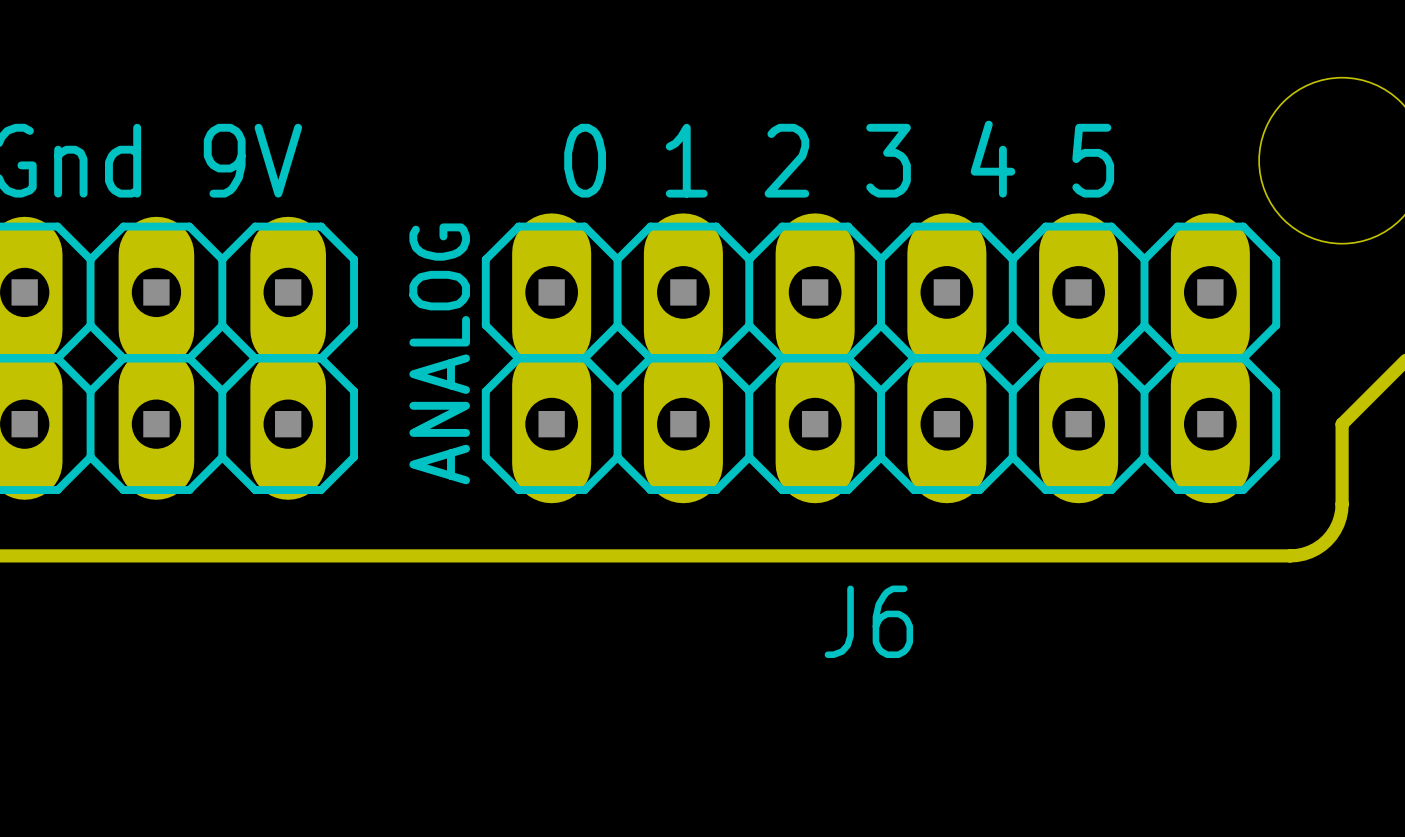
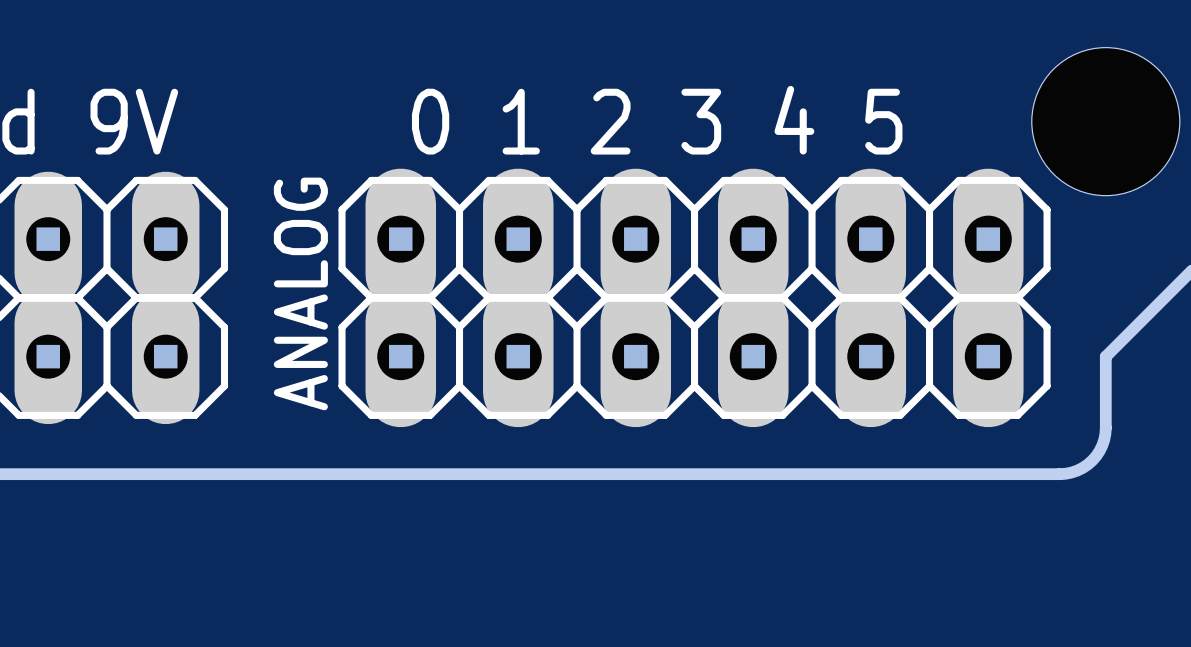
J6 name: J6 (868, 621) -> none

